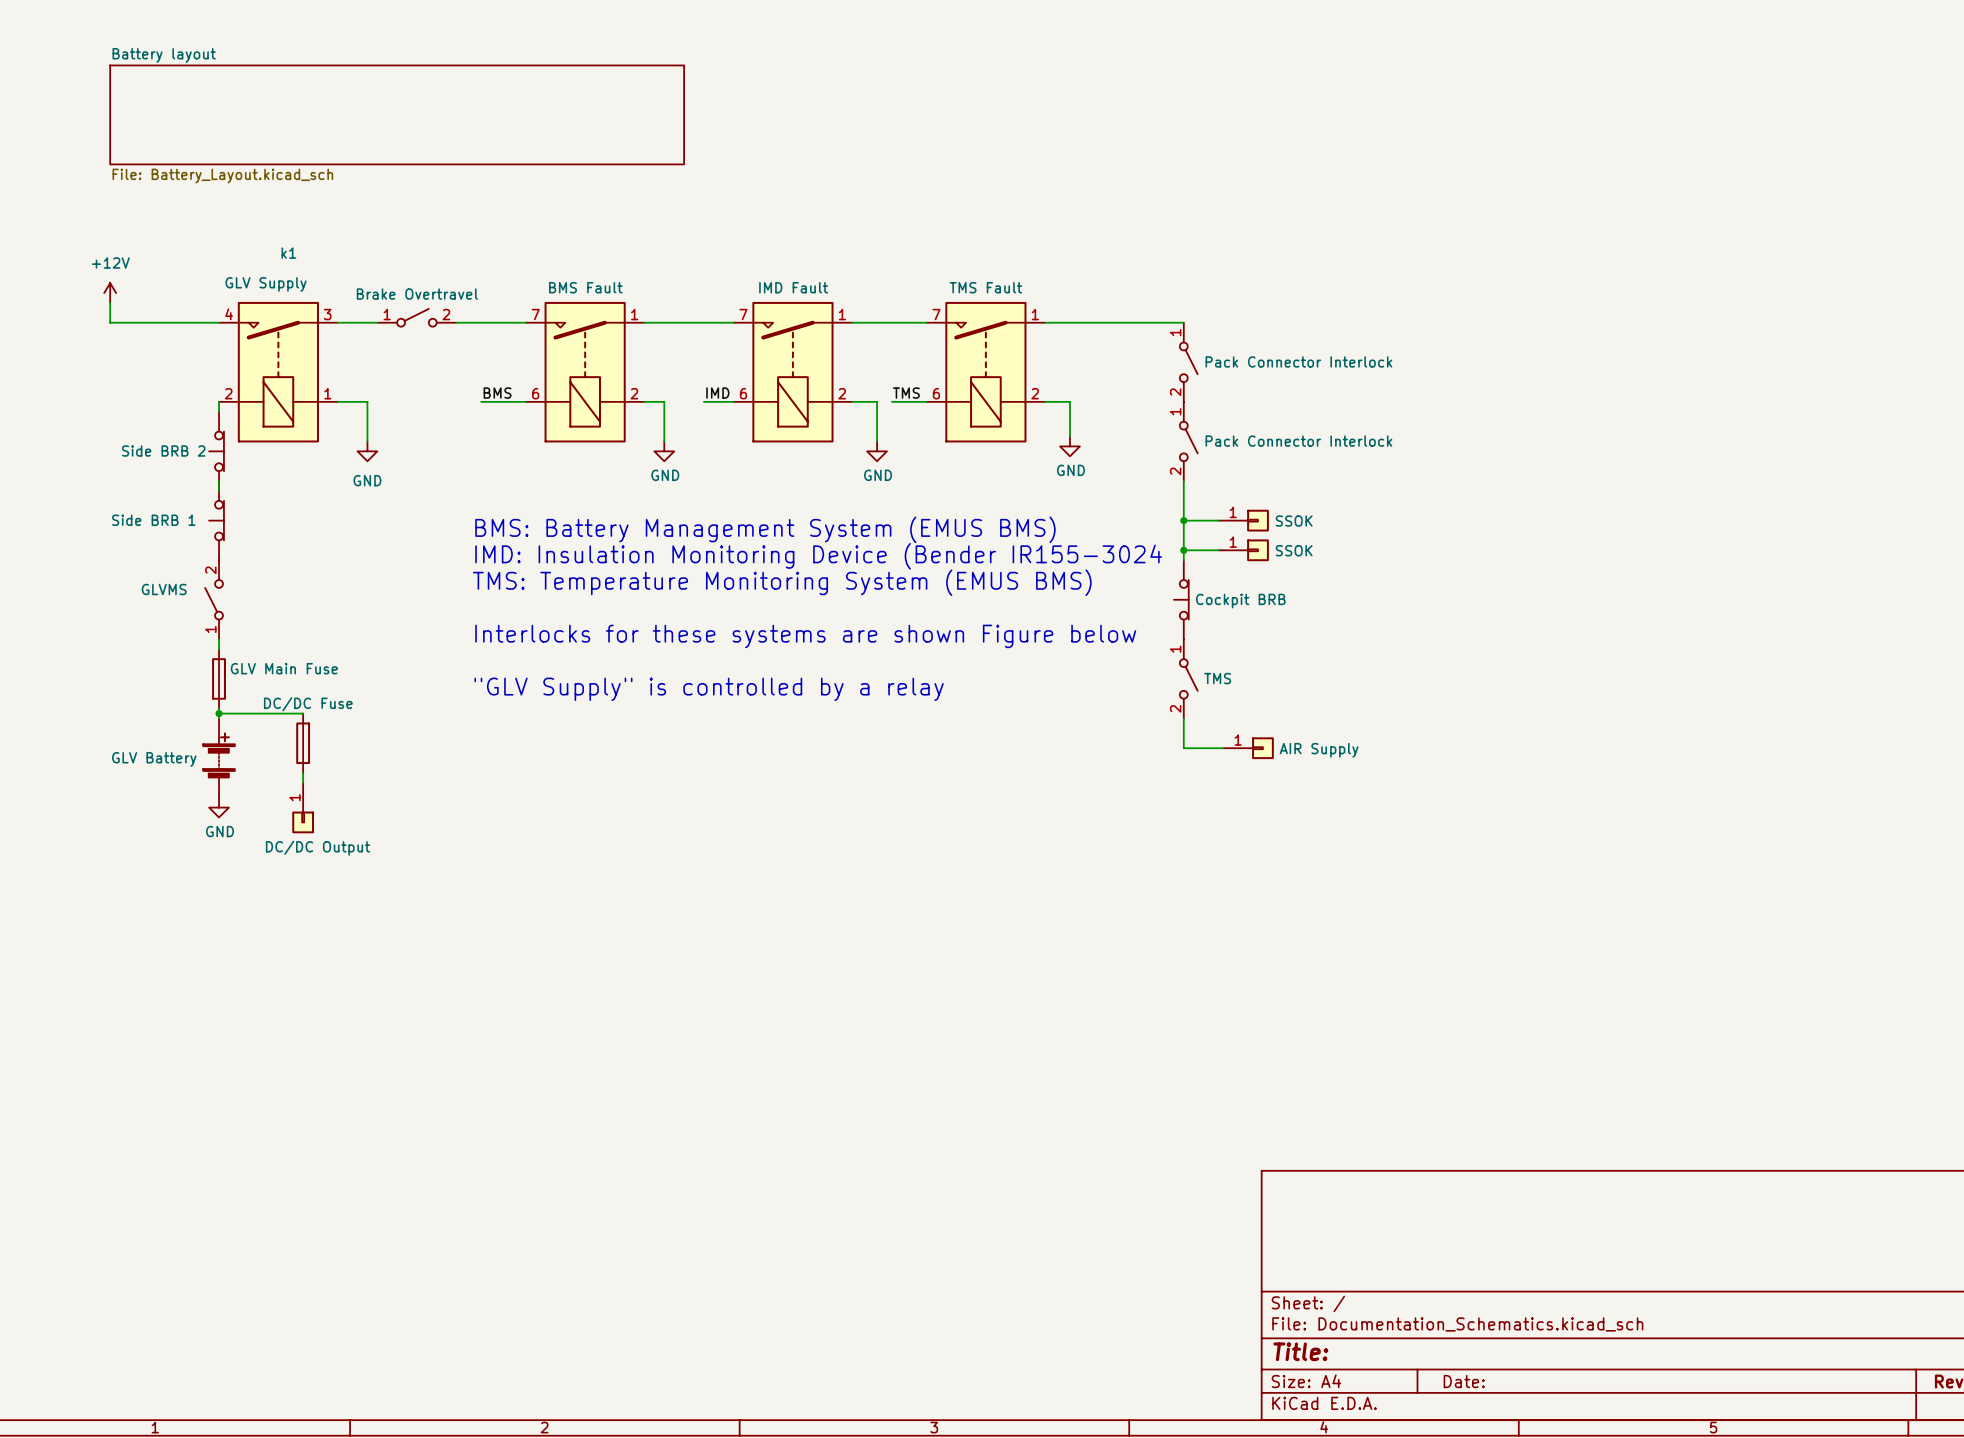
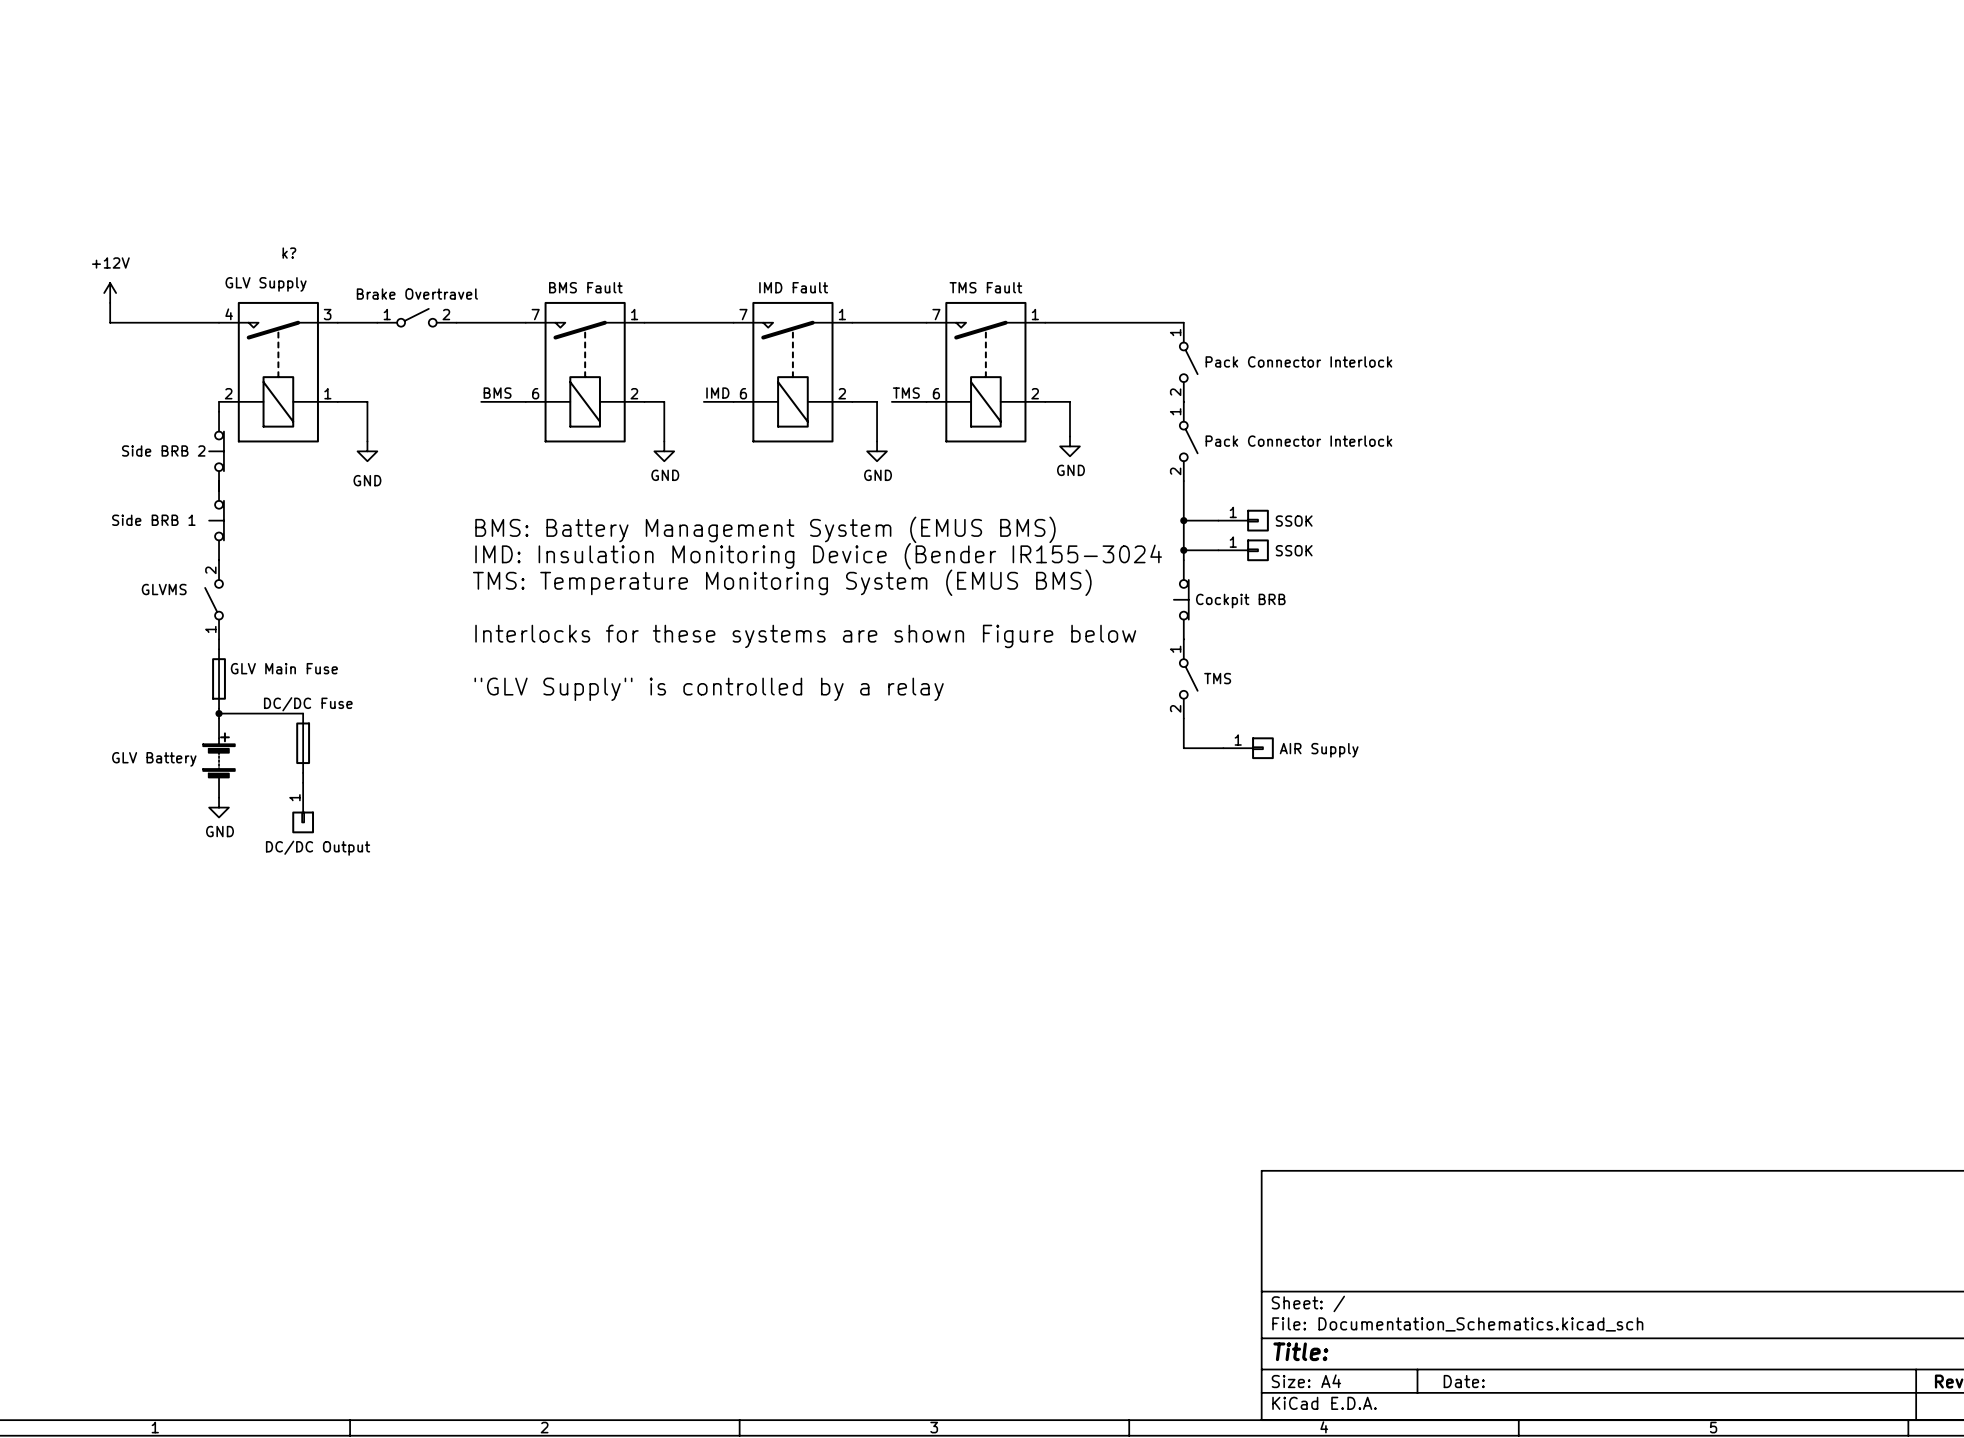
sheet Battery layout: File: Battery_Layout.kicad_sch (397, 114) -> none
k1 name: k1 (288, 253) -> k? (289, 253)

